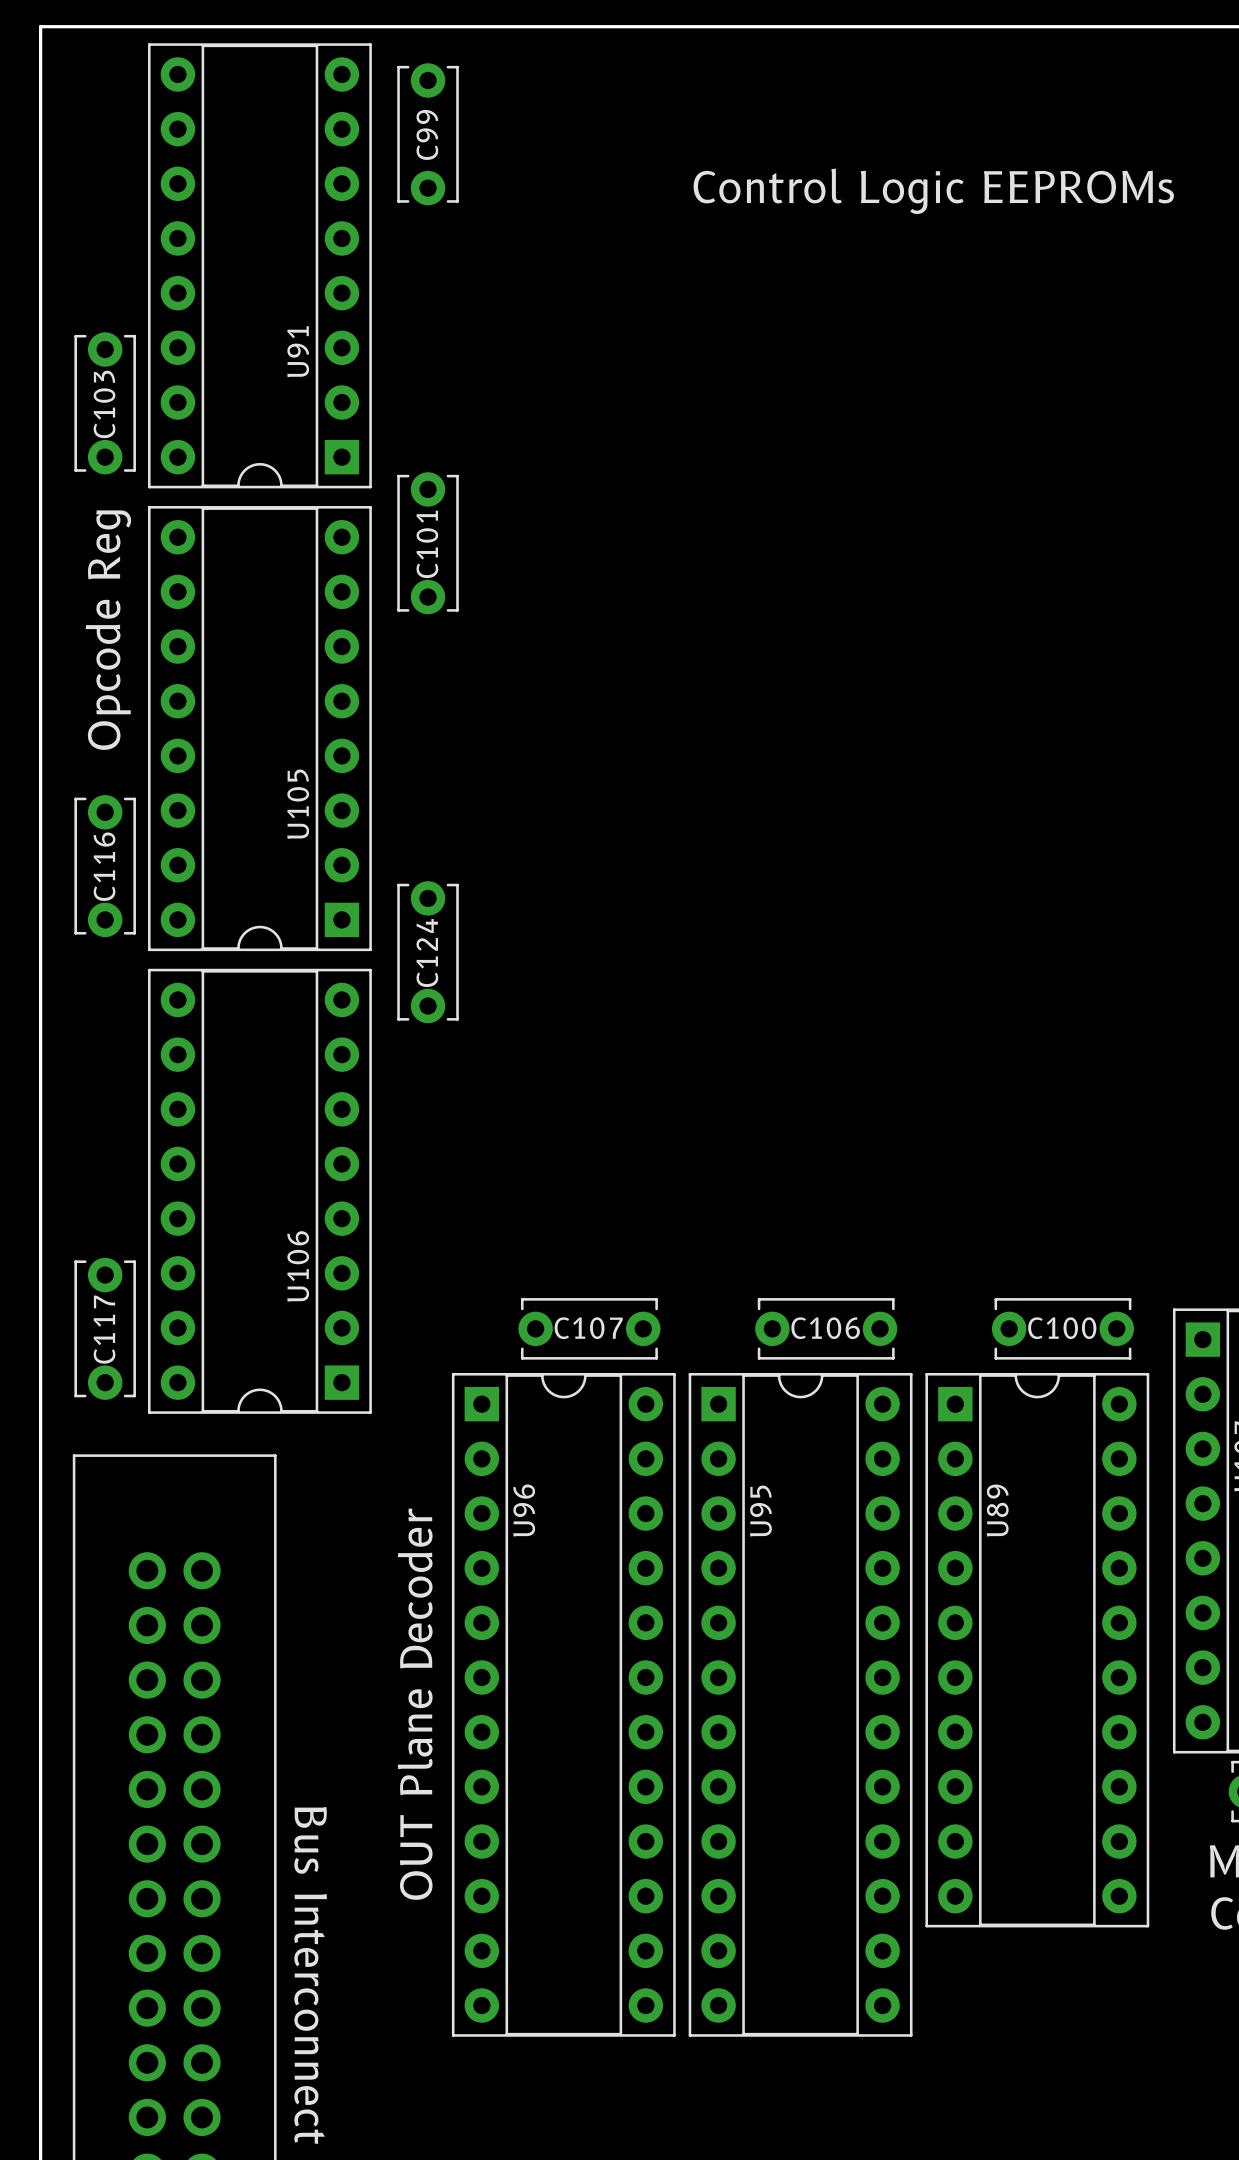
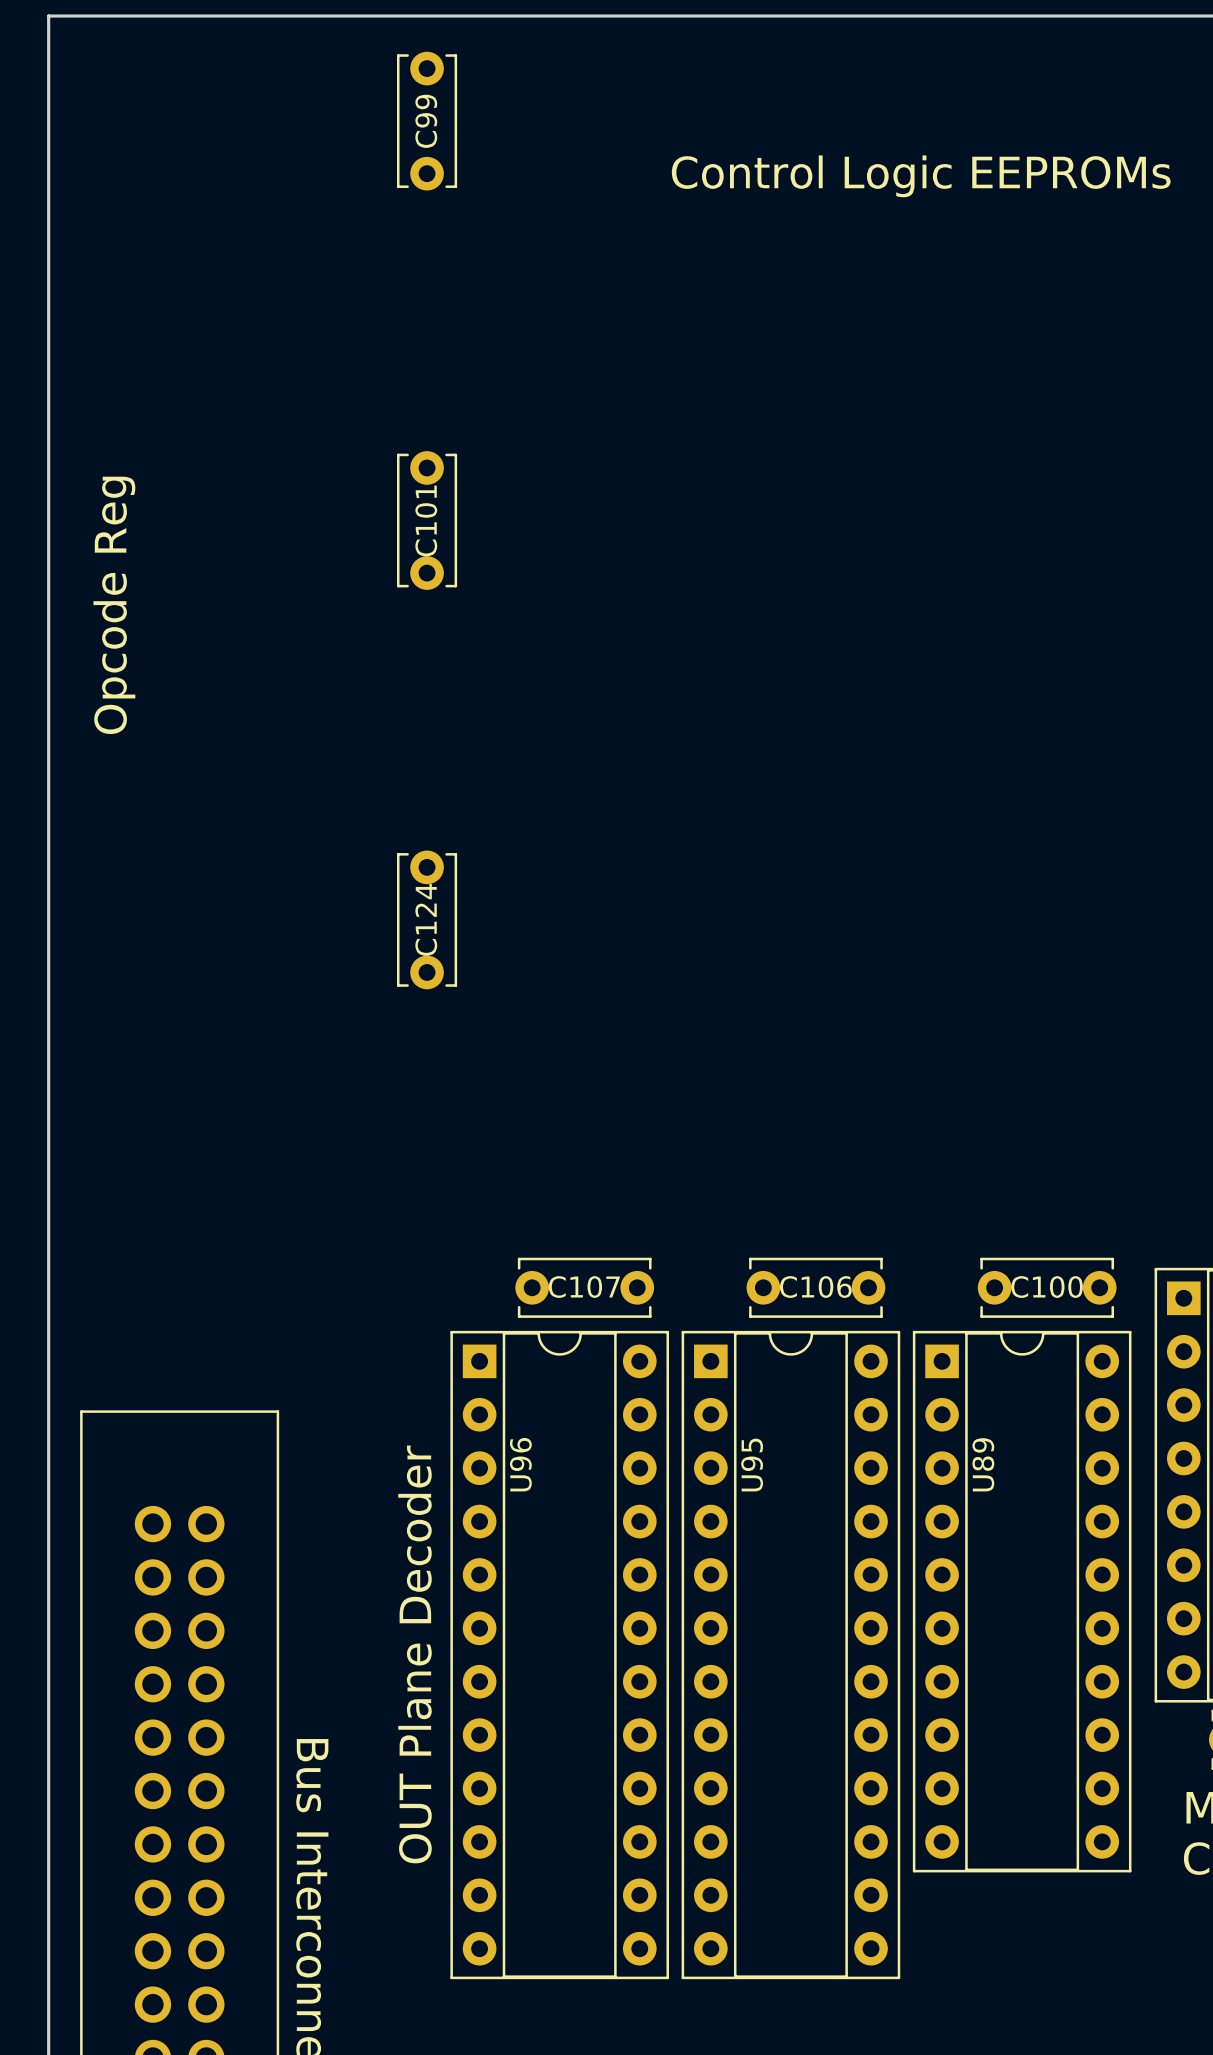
U91: (259, 265) -> none
C103: (105, 403) -> none
U105: (259, 728) -> none
C116: (105, 866) -> none
U106: (259, 1191) -> none
C117: (105, 1328) -> none

